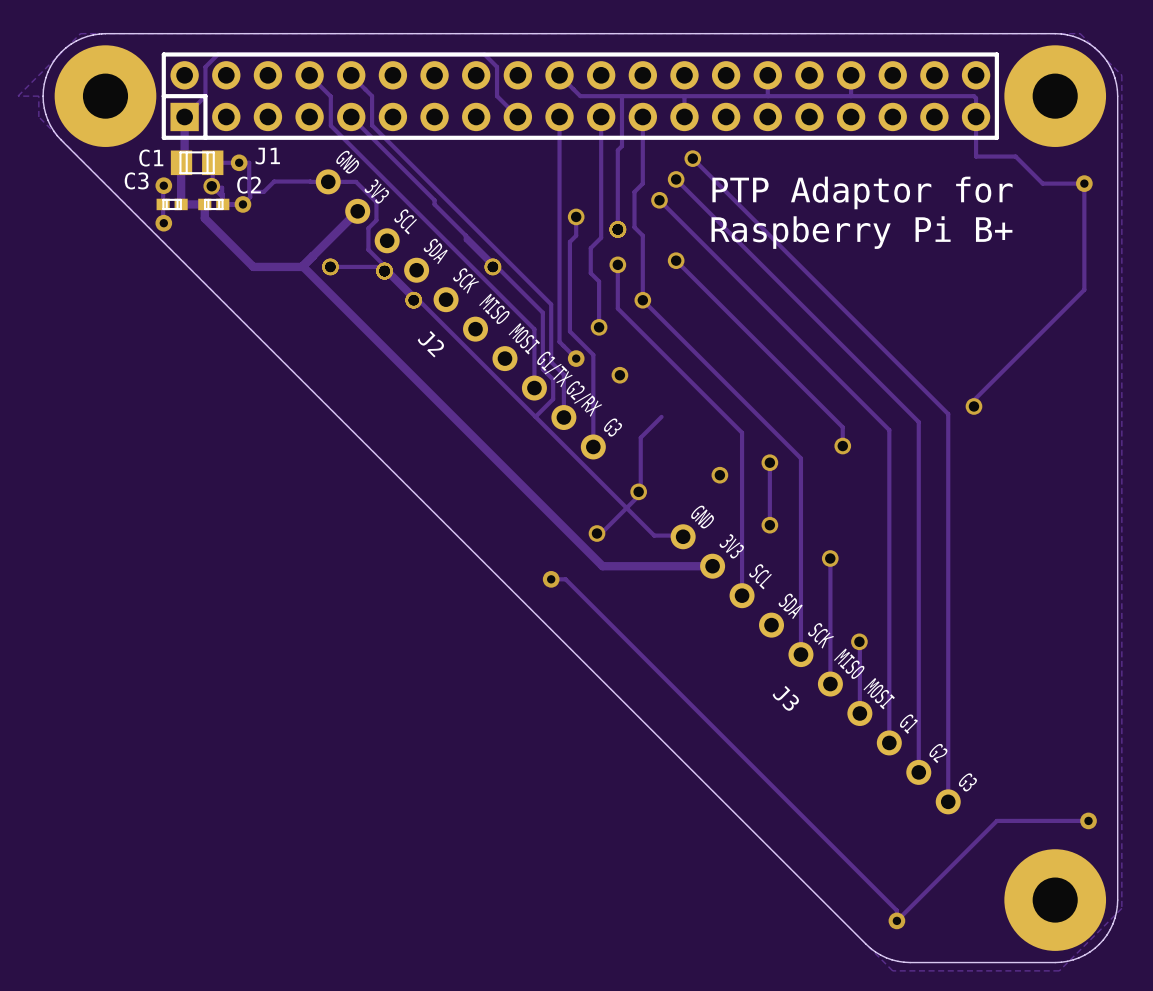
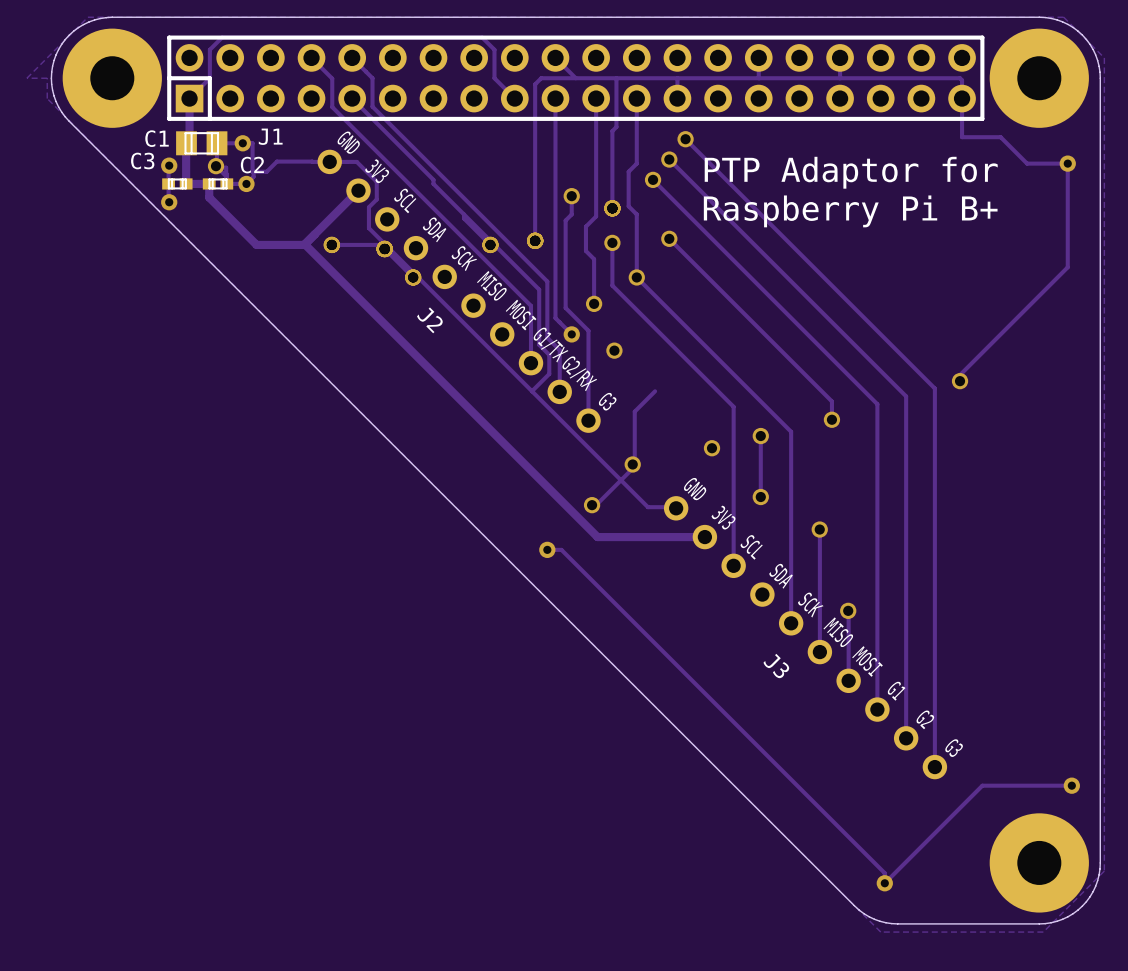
track: none -> (575, 78) (541, 78) (535, 84) (535, 240)
via: none -> (535, 240)

